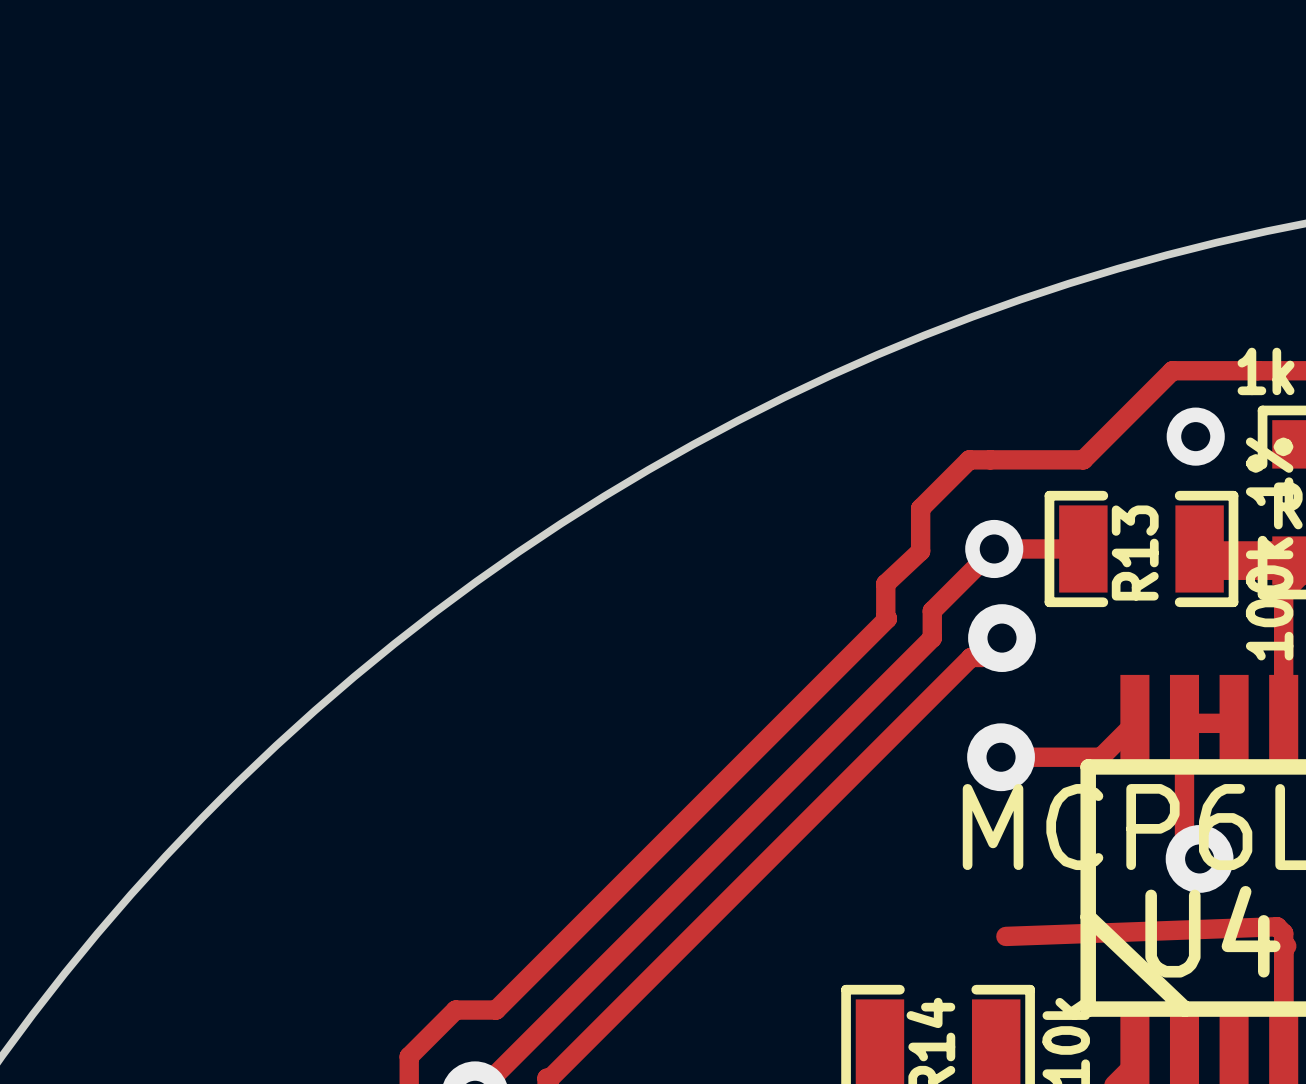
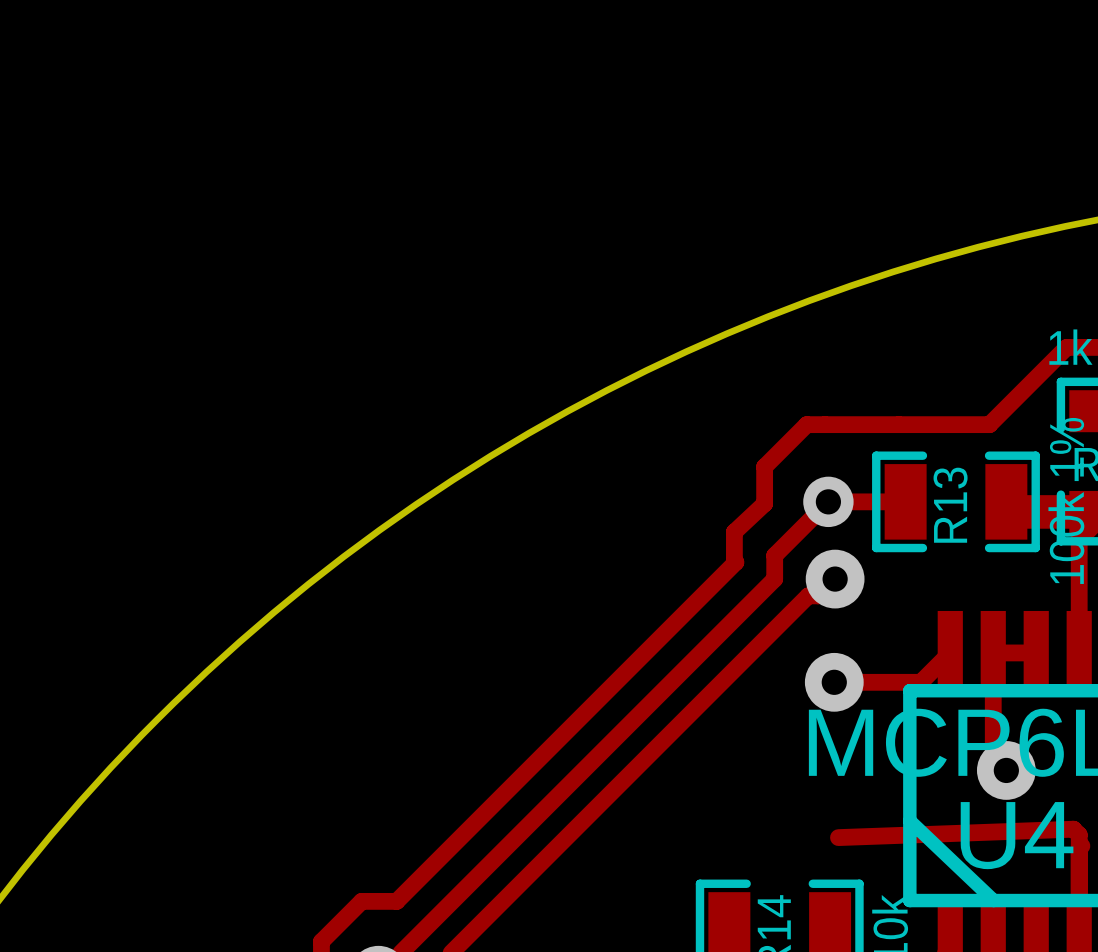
track: (1269, 370) (1172, 370) (1083, 459) -> (1066, 347) (989, 424) (905, 424)
via: (1195, 436) -> none

